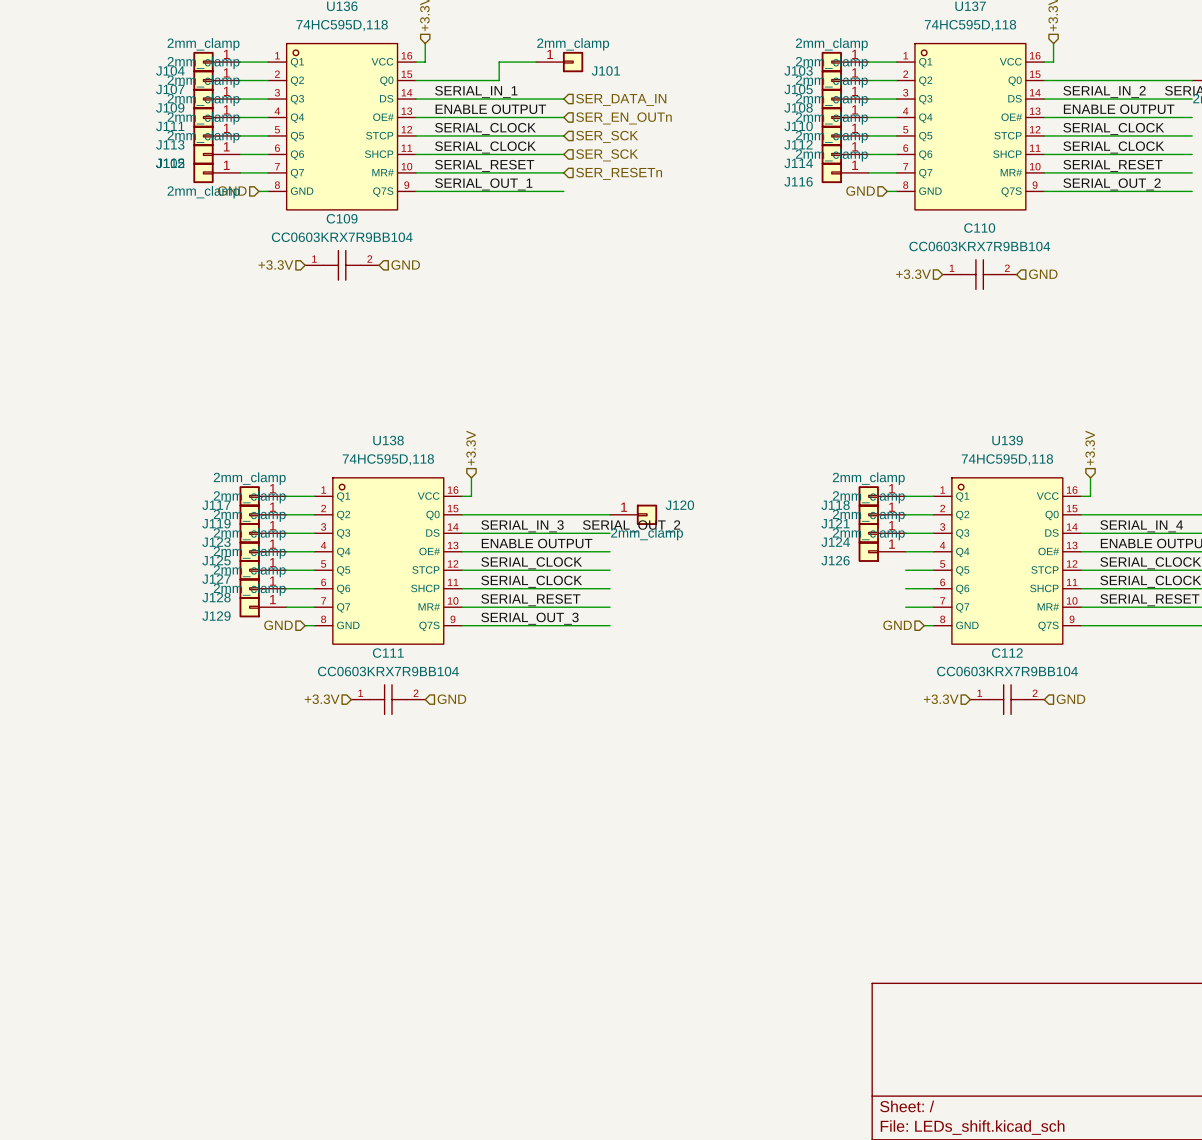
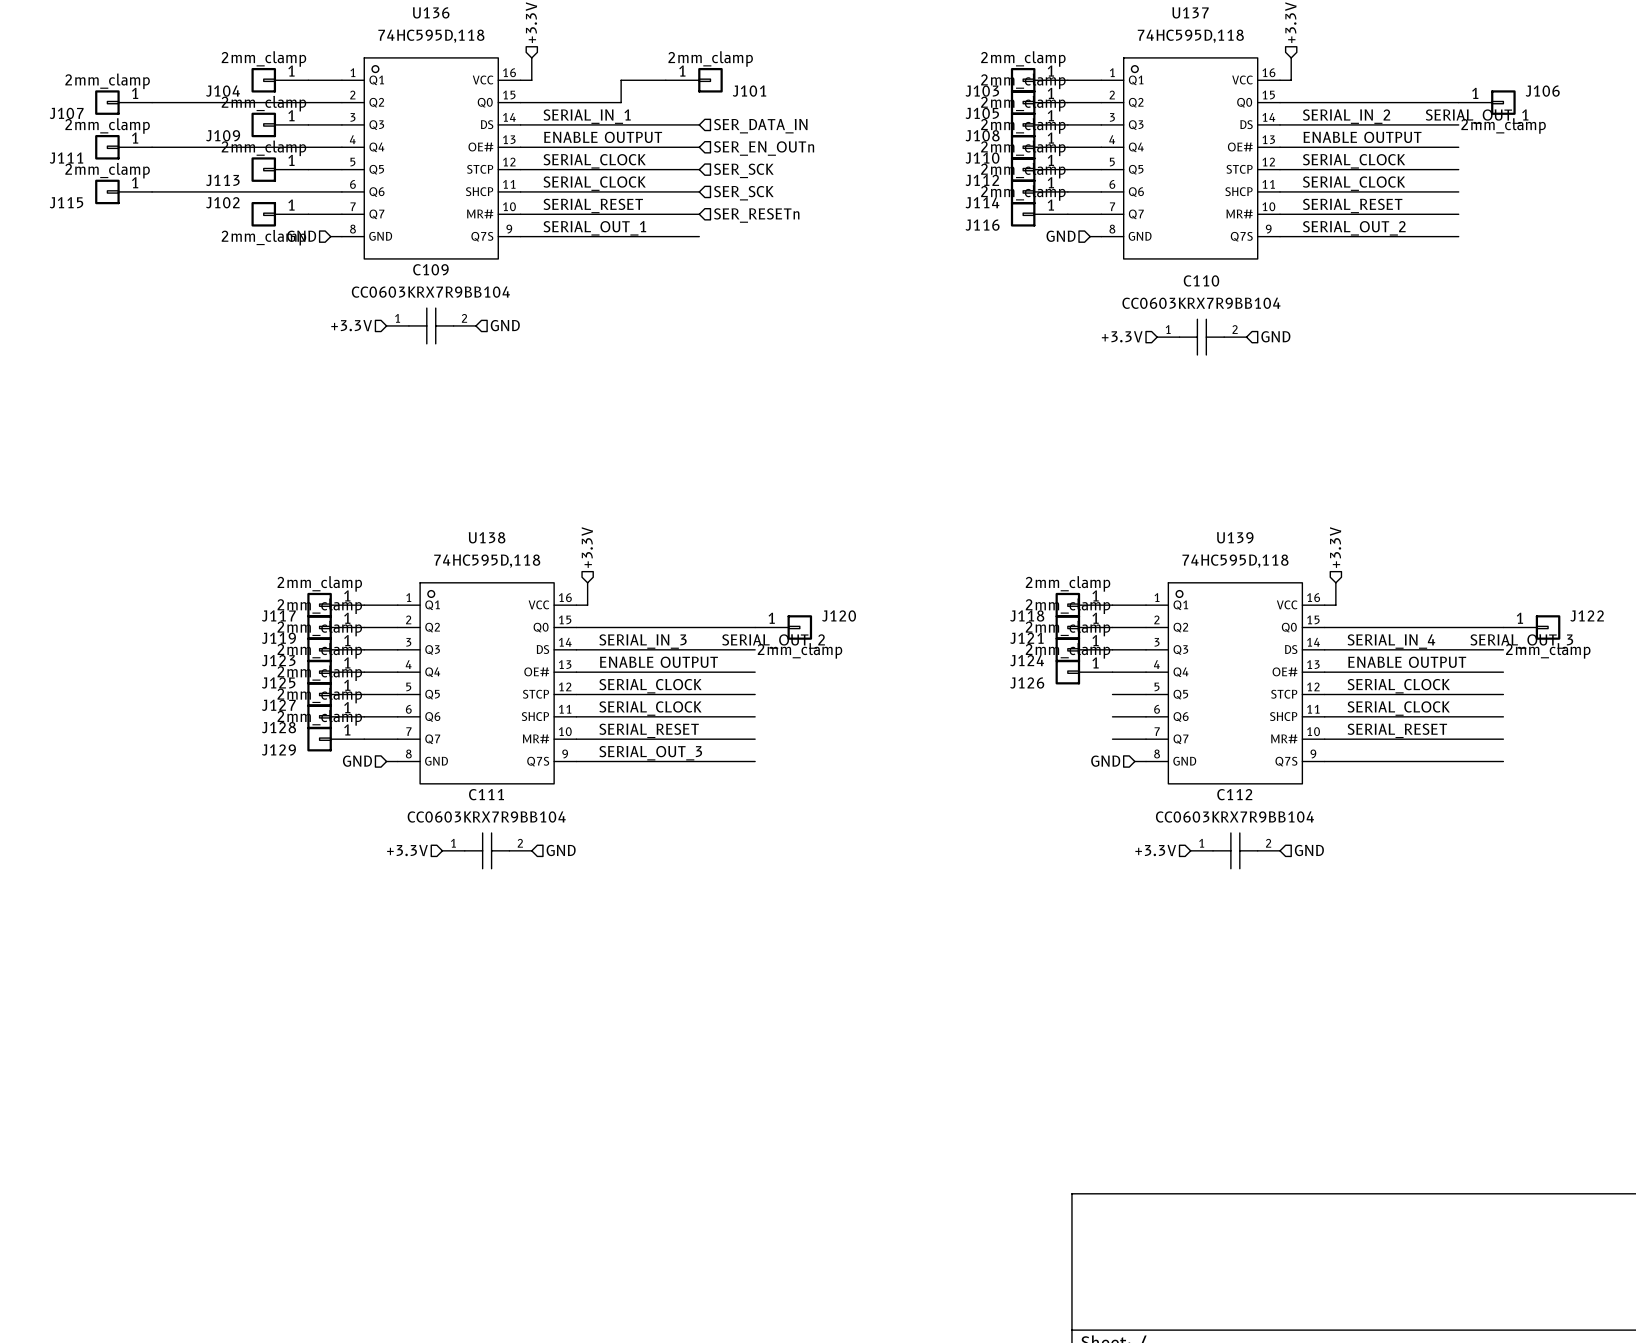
wire: none -> (152, 102) (308, 102)
J107 position: (216, 80) -> (123, 102)
wire: none -> (152, 147) (308, 147)
J111 position: (216, 117) -> (123, 147)
wire: none -> (152, 191) (308, 191)
J115 position: (216, 154) -> (123, 191)

